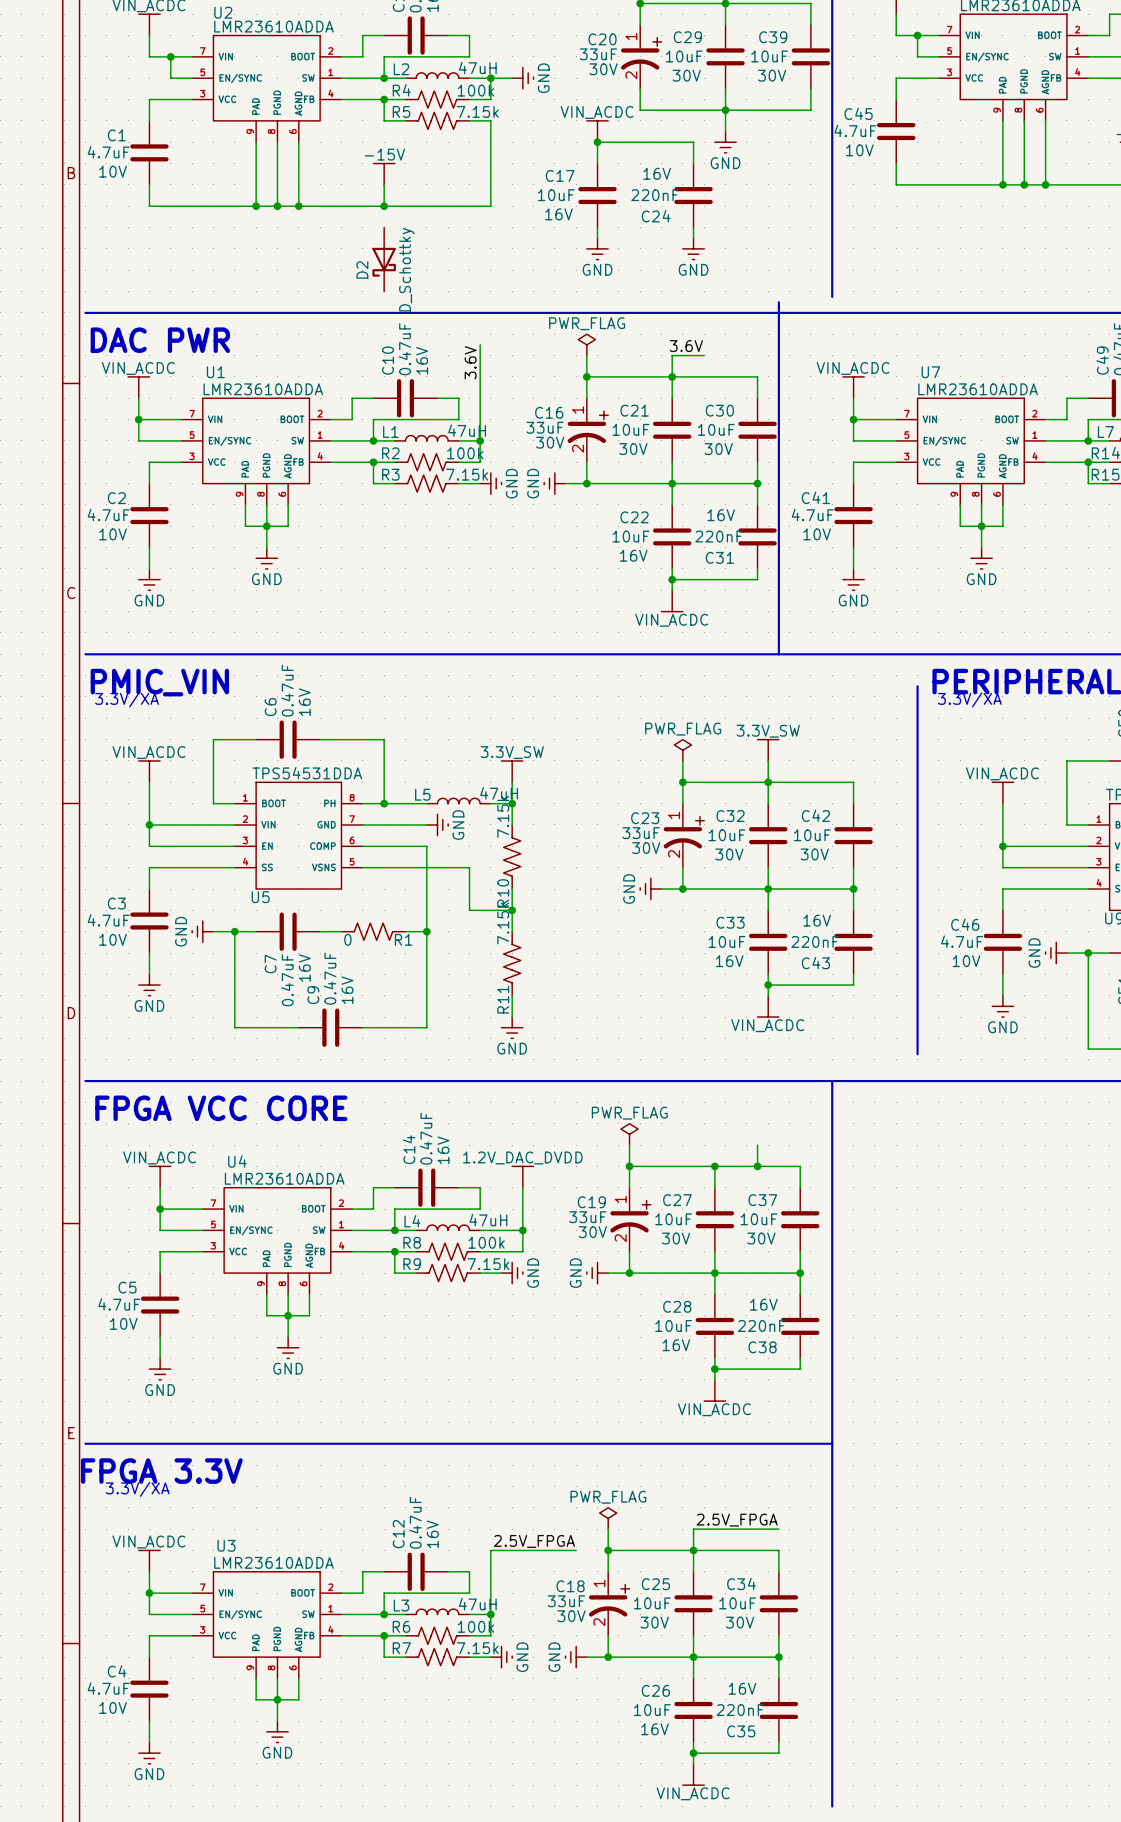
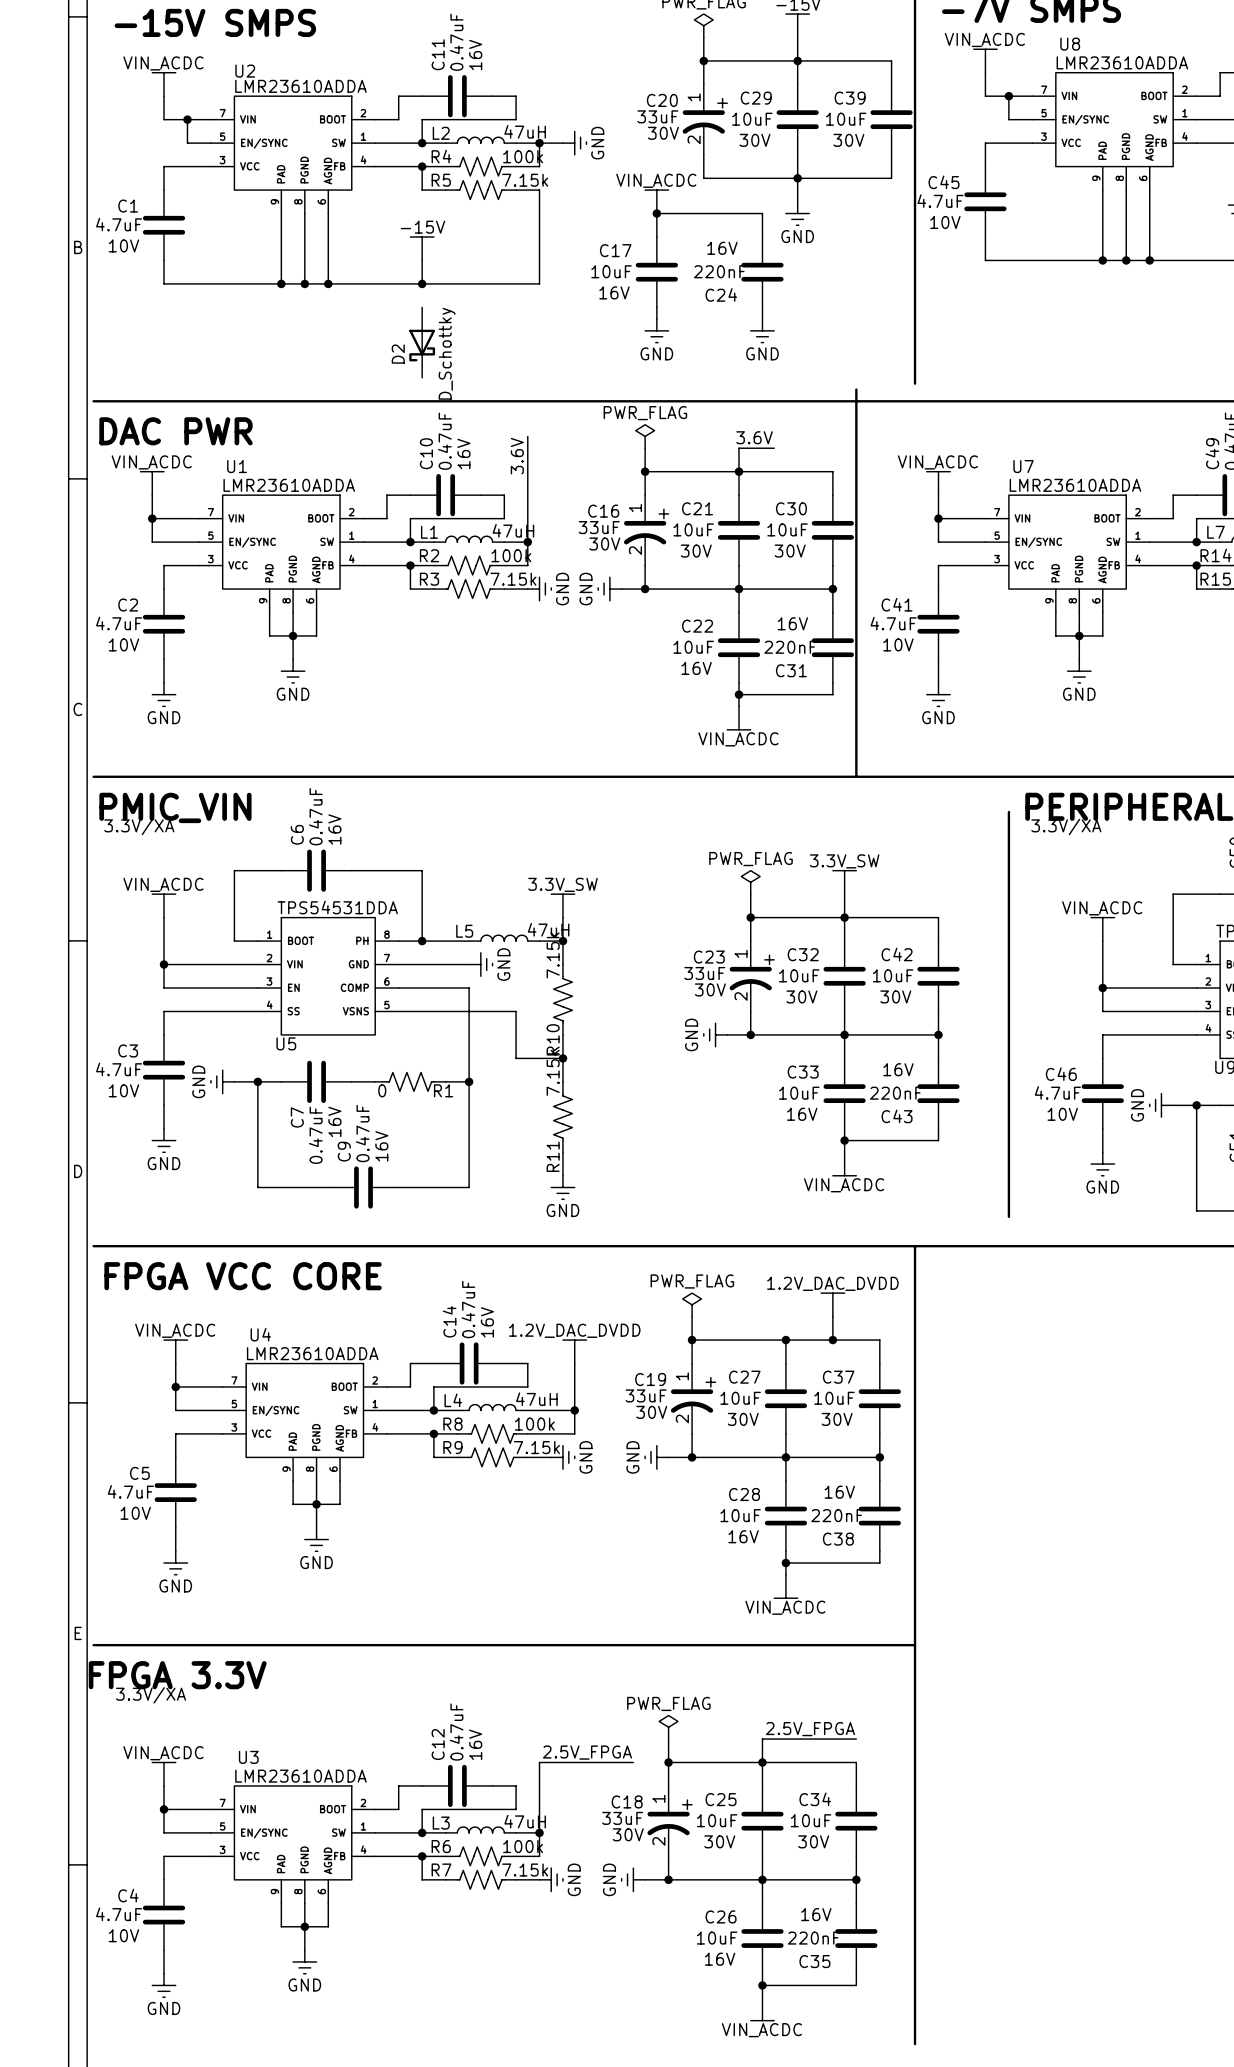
power symbol: none -> 1.2V_DAC_DVDD (832, 1304)

